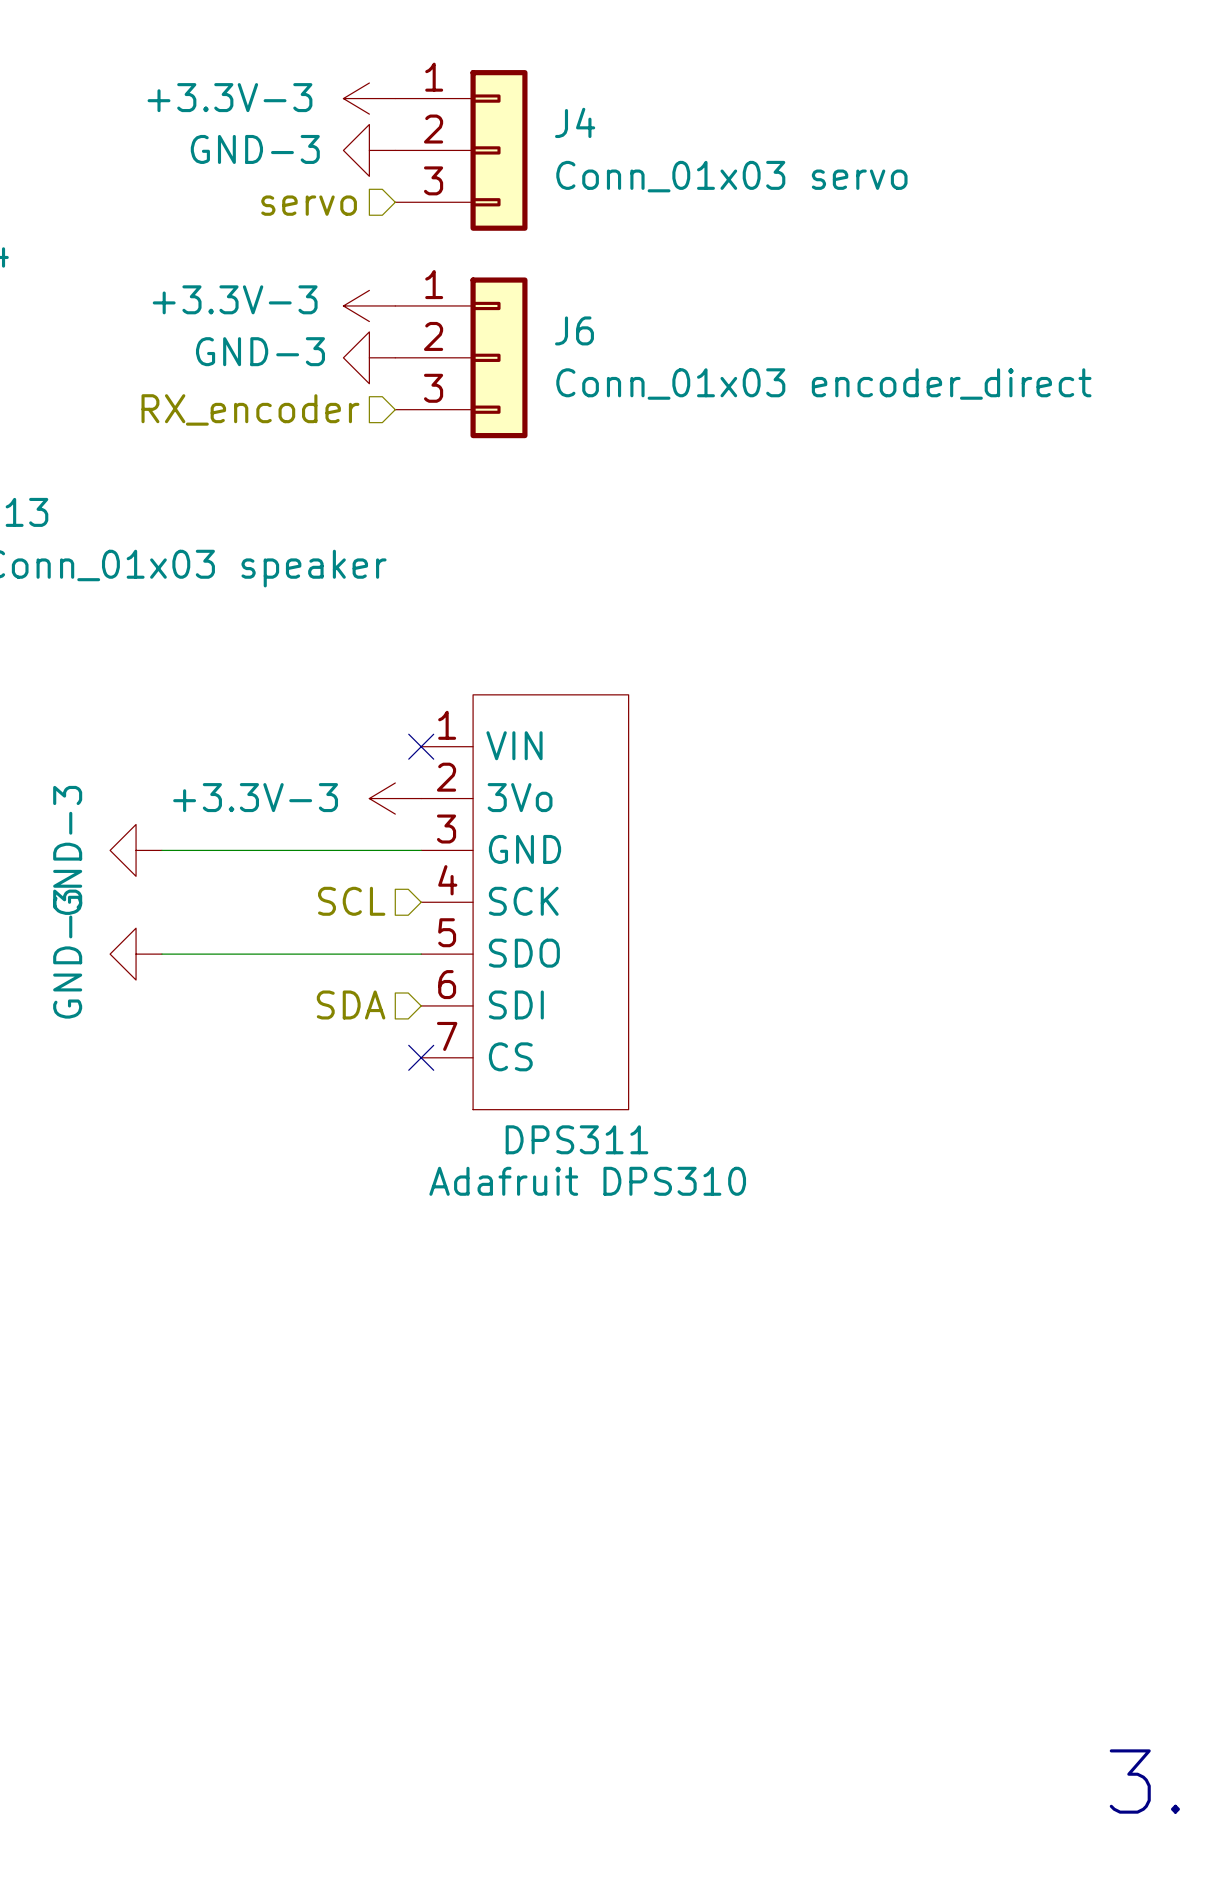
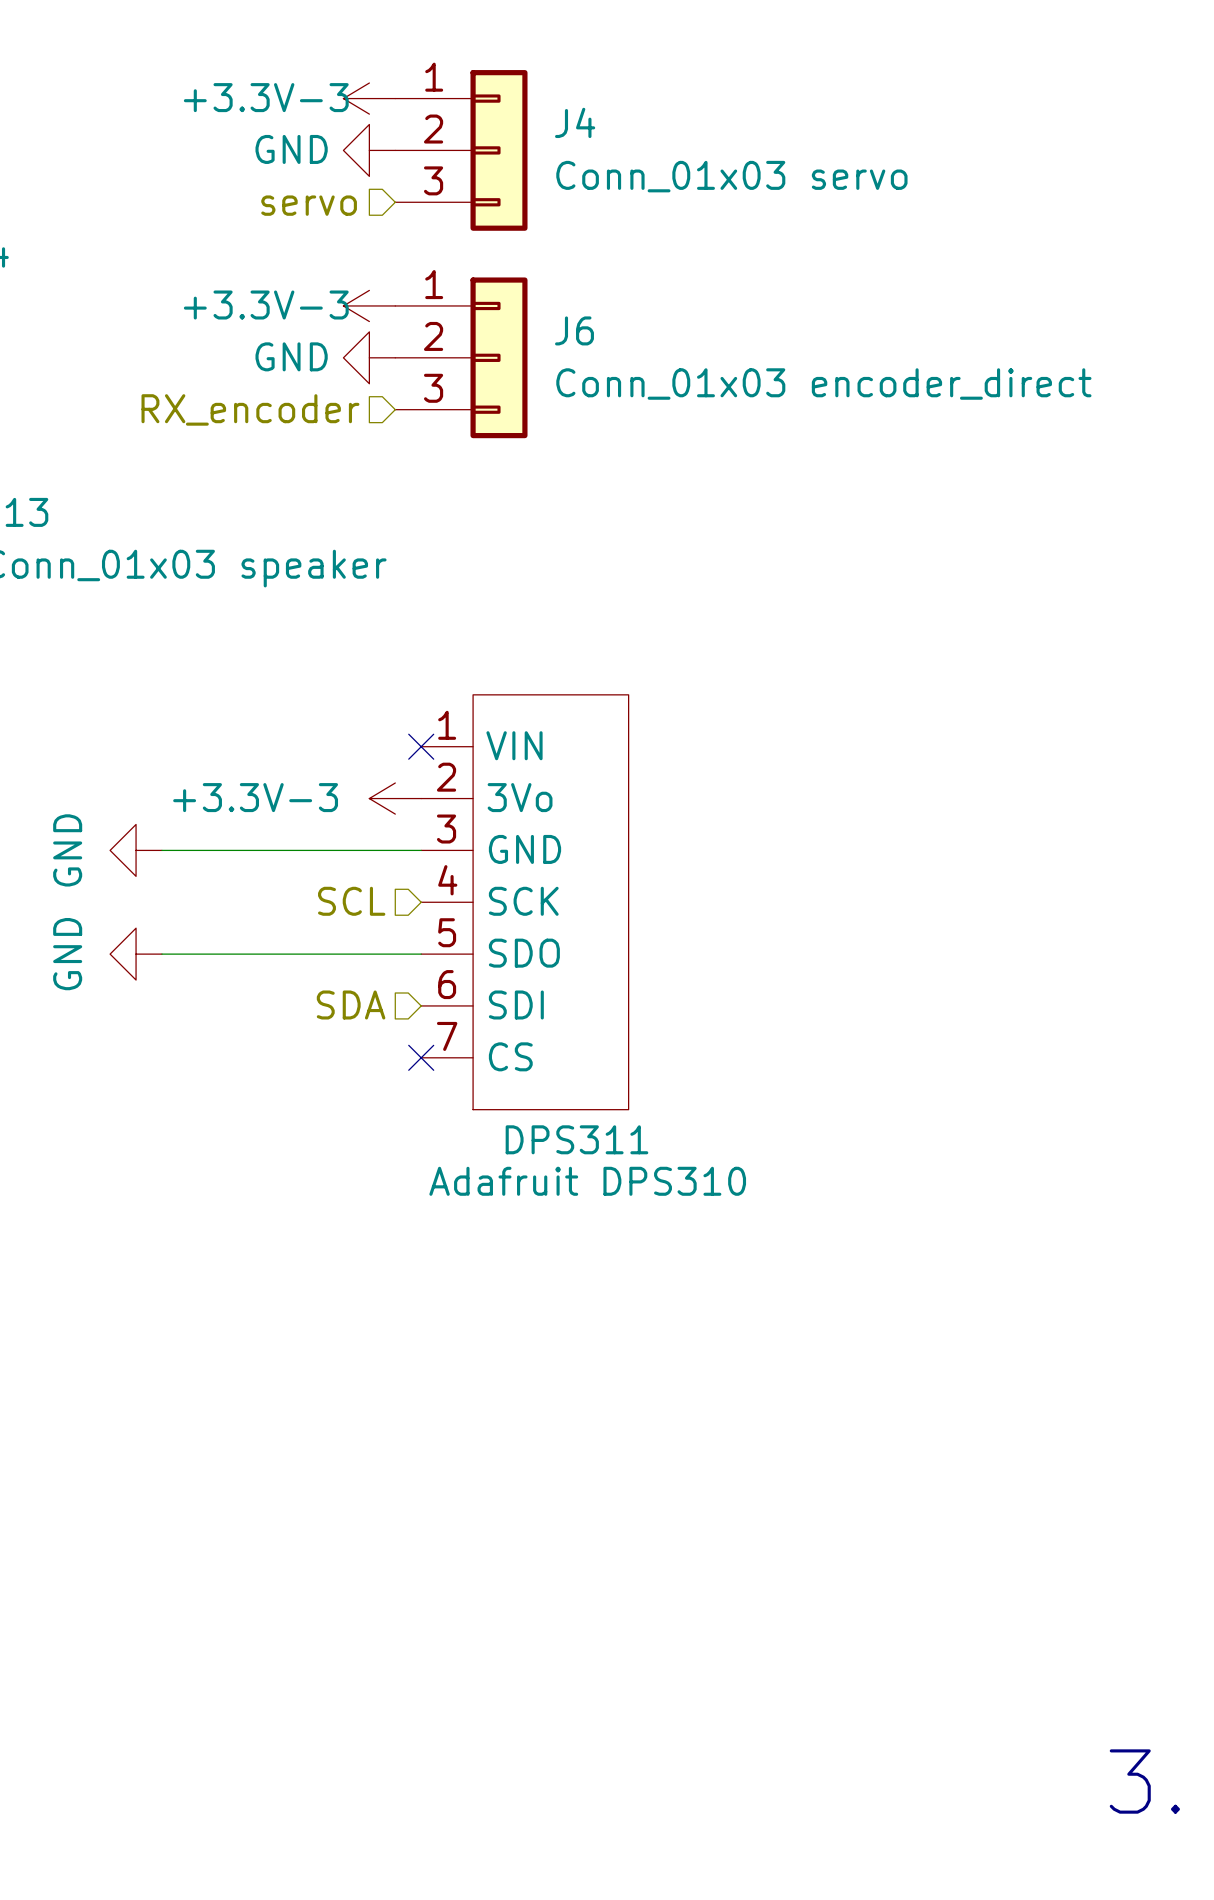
power symbol text position: +3.3V-3 (229, 97) -> +3.3V-3 (266, 97)
power symbol: GND-3 (369, 150) -> GND (369, 150)
power symbol text position: +3.3V-3 (235, 299) -> +3.3V-3 (266, 305)
power symbol: GND-3 (369, 357) -> GND (369, 357)
power symbol: GND-3 (136, 850) -> GND (136, 850)
power symbol: GND-3 (136, 954) -> GND (136, 954)

